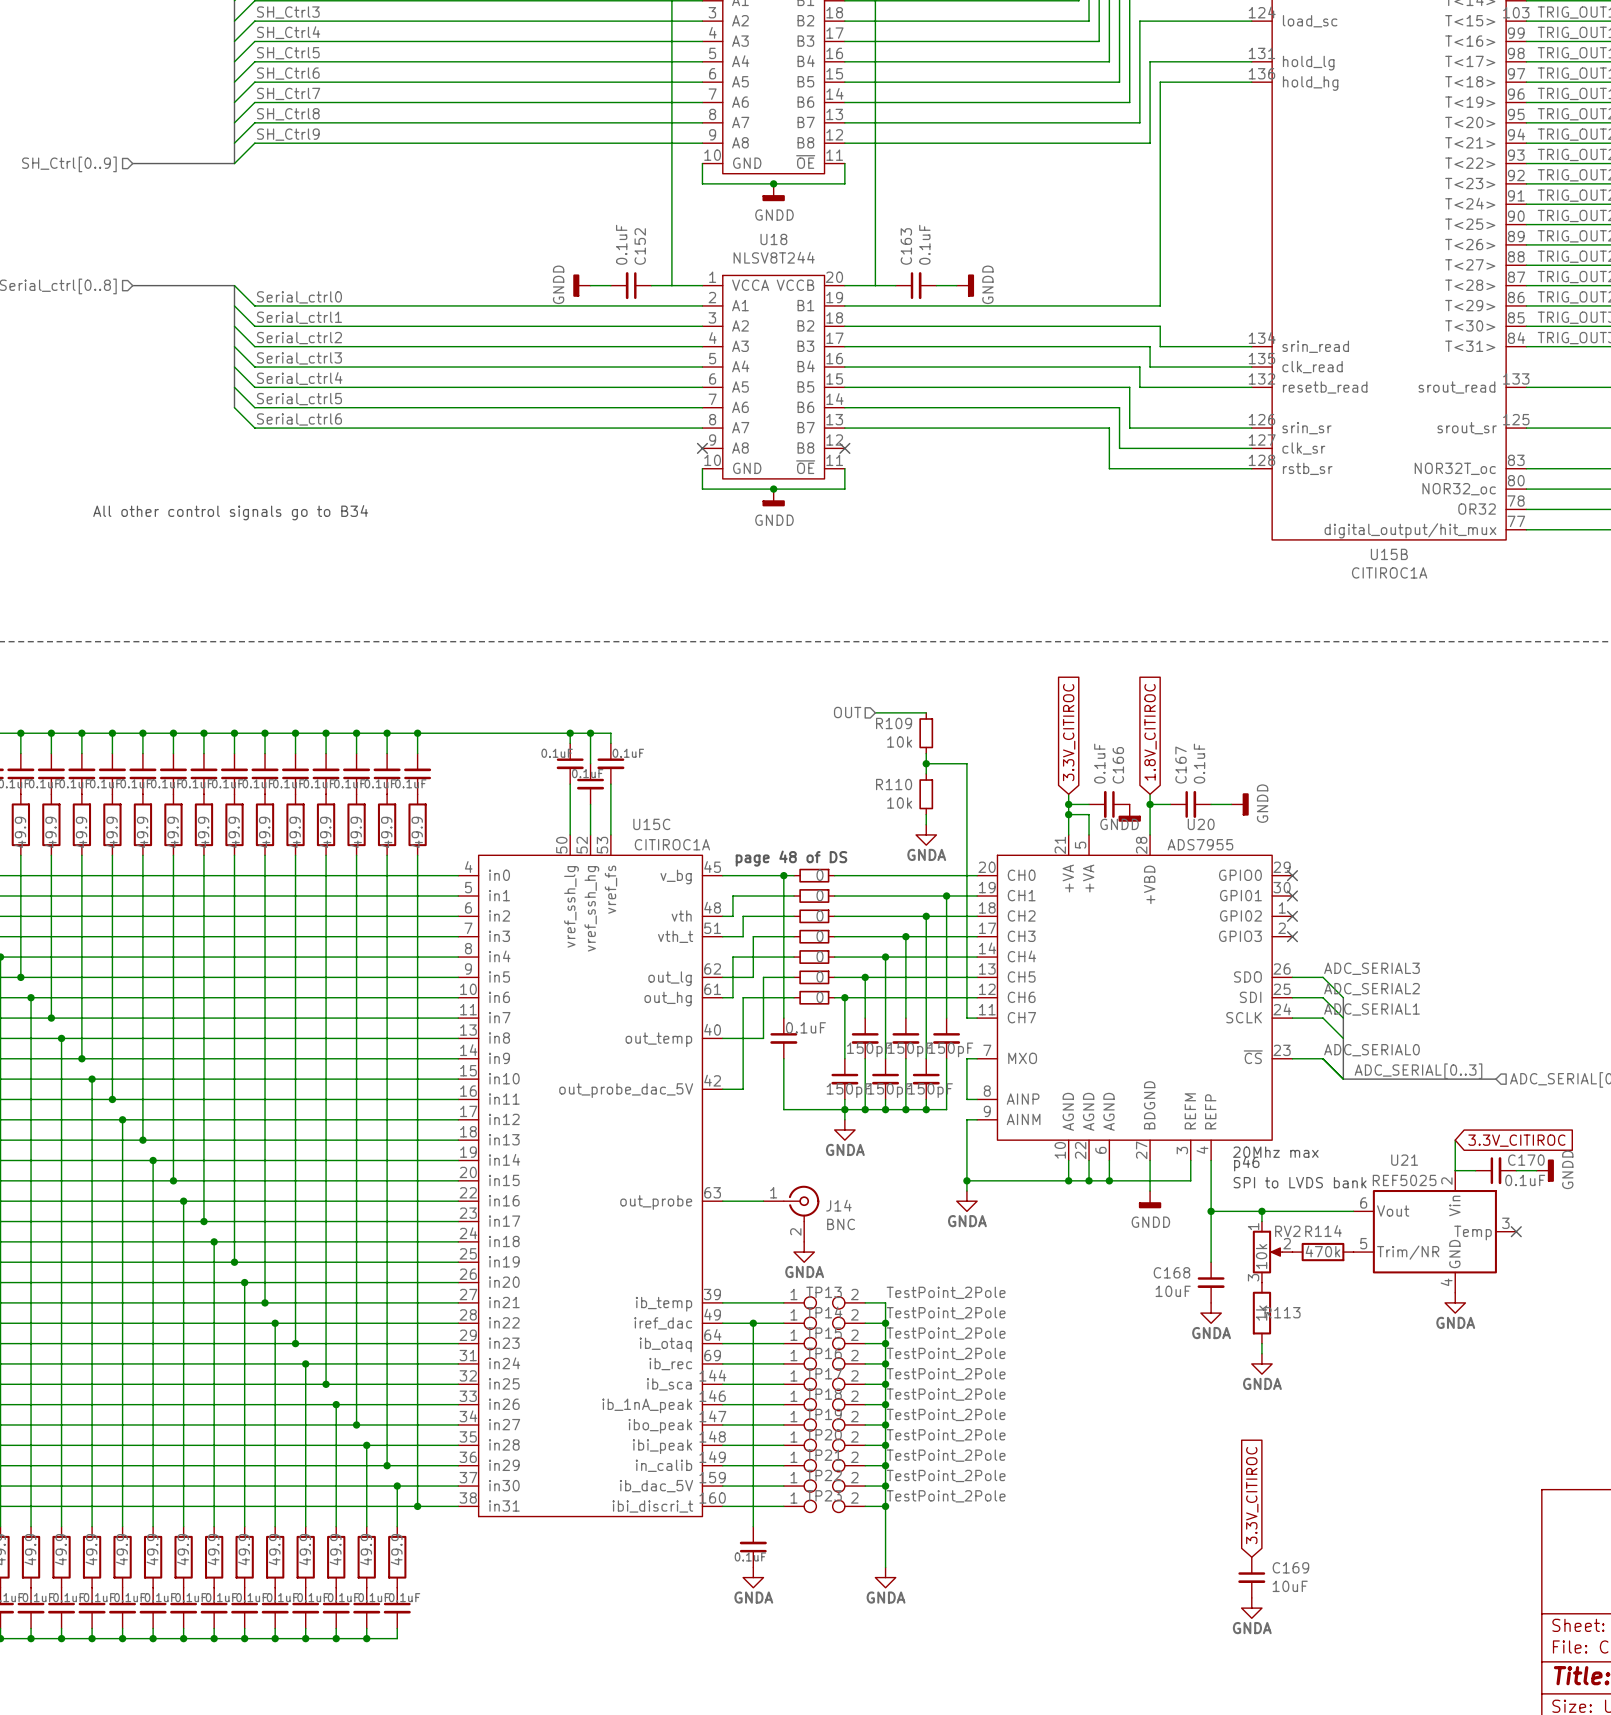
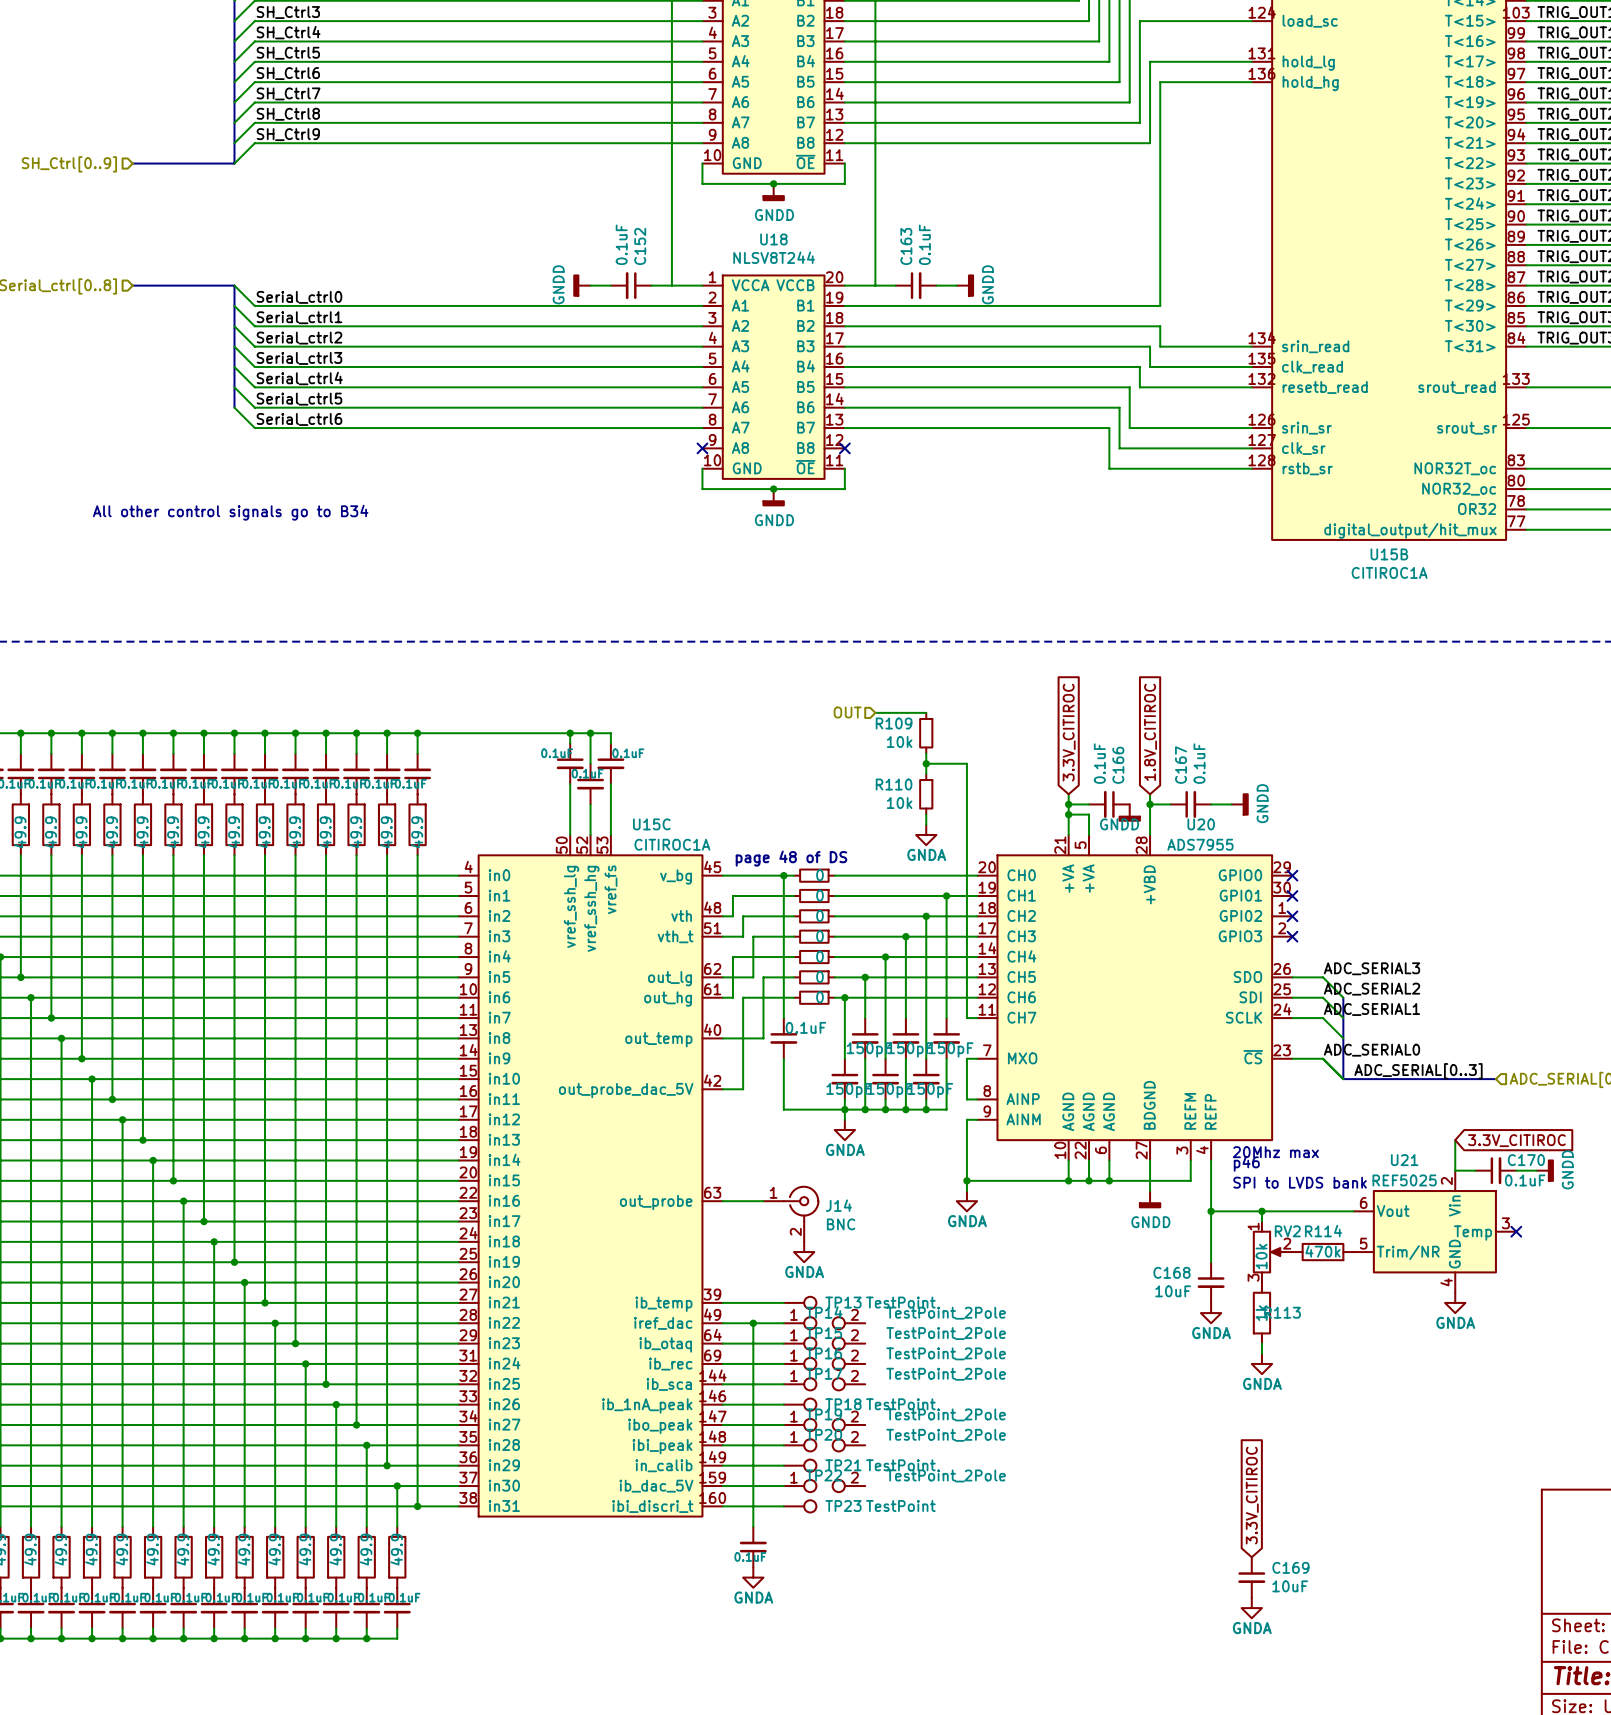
TP13 name position: TP13 (824, 1292) -> TP13 (843, 1302)
TP13 value: TestPoint_2Pole (946, 1292) -> TestPoint (900, 1302)
TP13 symbol: [783, 1296, 866, 1310] -> [783, 1296, 817, 1310]
wire: (865, 1302) (885, 1302) (885, 1567) -> none
wire: (865, 1323) (885, 1323) -> none
junction: (885, 1323) -> none
wire: (865, 1343) (885, 1343) -> none
junction: (885, 1343) -> none
wire: (865, 1363) (885, 1363) -> none
junction: (885, 1363) -> none
wire: (865, 1384) (885, 1384) -> none
junction: (885, 1384) -> none
TP18 name position: TP18 (824, 1394) -> TP18 (843, 1404)
TP18 value: TestPoint_2Pole (946, 1394) -> TestPoint (900, 1404)
TP18 symbol: [783, 1398, 866, 1411] -> [783, 1398, 817, 1411]
wire: (865, 1404) (885, 1404) -> none
junction: (885, 1404) -> none
wire: (865, 1424) (885, 1424) -> none
junction: (885, 1424) -> none
wire: (865, 1445) (885, 1445) -> none
junction: (885, 1445) -> none
TP21 name position: TP21 (824, 1455) -> TP21 (843, 1465)
TP21 value: TestPoint_2Pole (946, 1455) -> TestPoint (900, 1465)
TP21 symbol: [783, 1459, 866, 1472] -> [783, 1459, 817, 1472]
wire: (865, 1465) (885, 1465) -> none
junction: (885, 1465) -> none
wire: (865, 1486) (885, 1486) -> none
junction: (885, 1486) -> none
TP23 name position: TP23 (824, 1495) -> TP23 (843, 1505)
TP23 value: TestPoint_2Pole (946, 1496) -> TestPoint (900, 1505)
TP23 symbol: [783, 1500, 866, 1513] -> [783, 1500, 817, 1513]
wire: (865, 1506) (885, 1506) -> none
junction: (885, 1506) -> none
power symbol: GNDA (885, 1577) -> none

